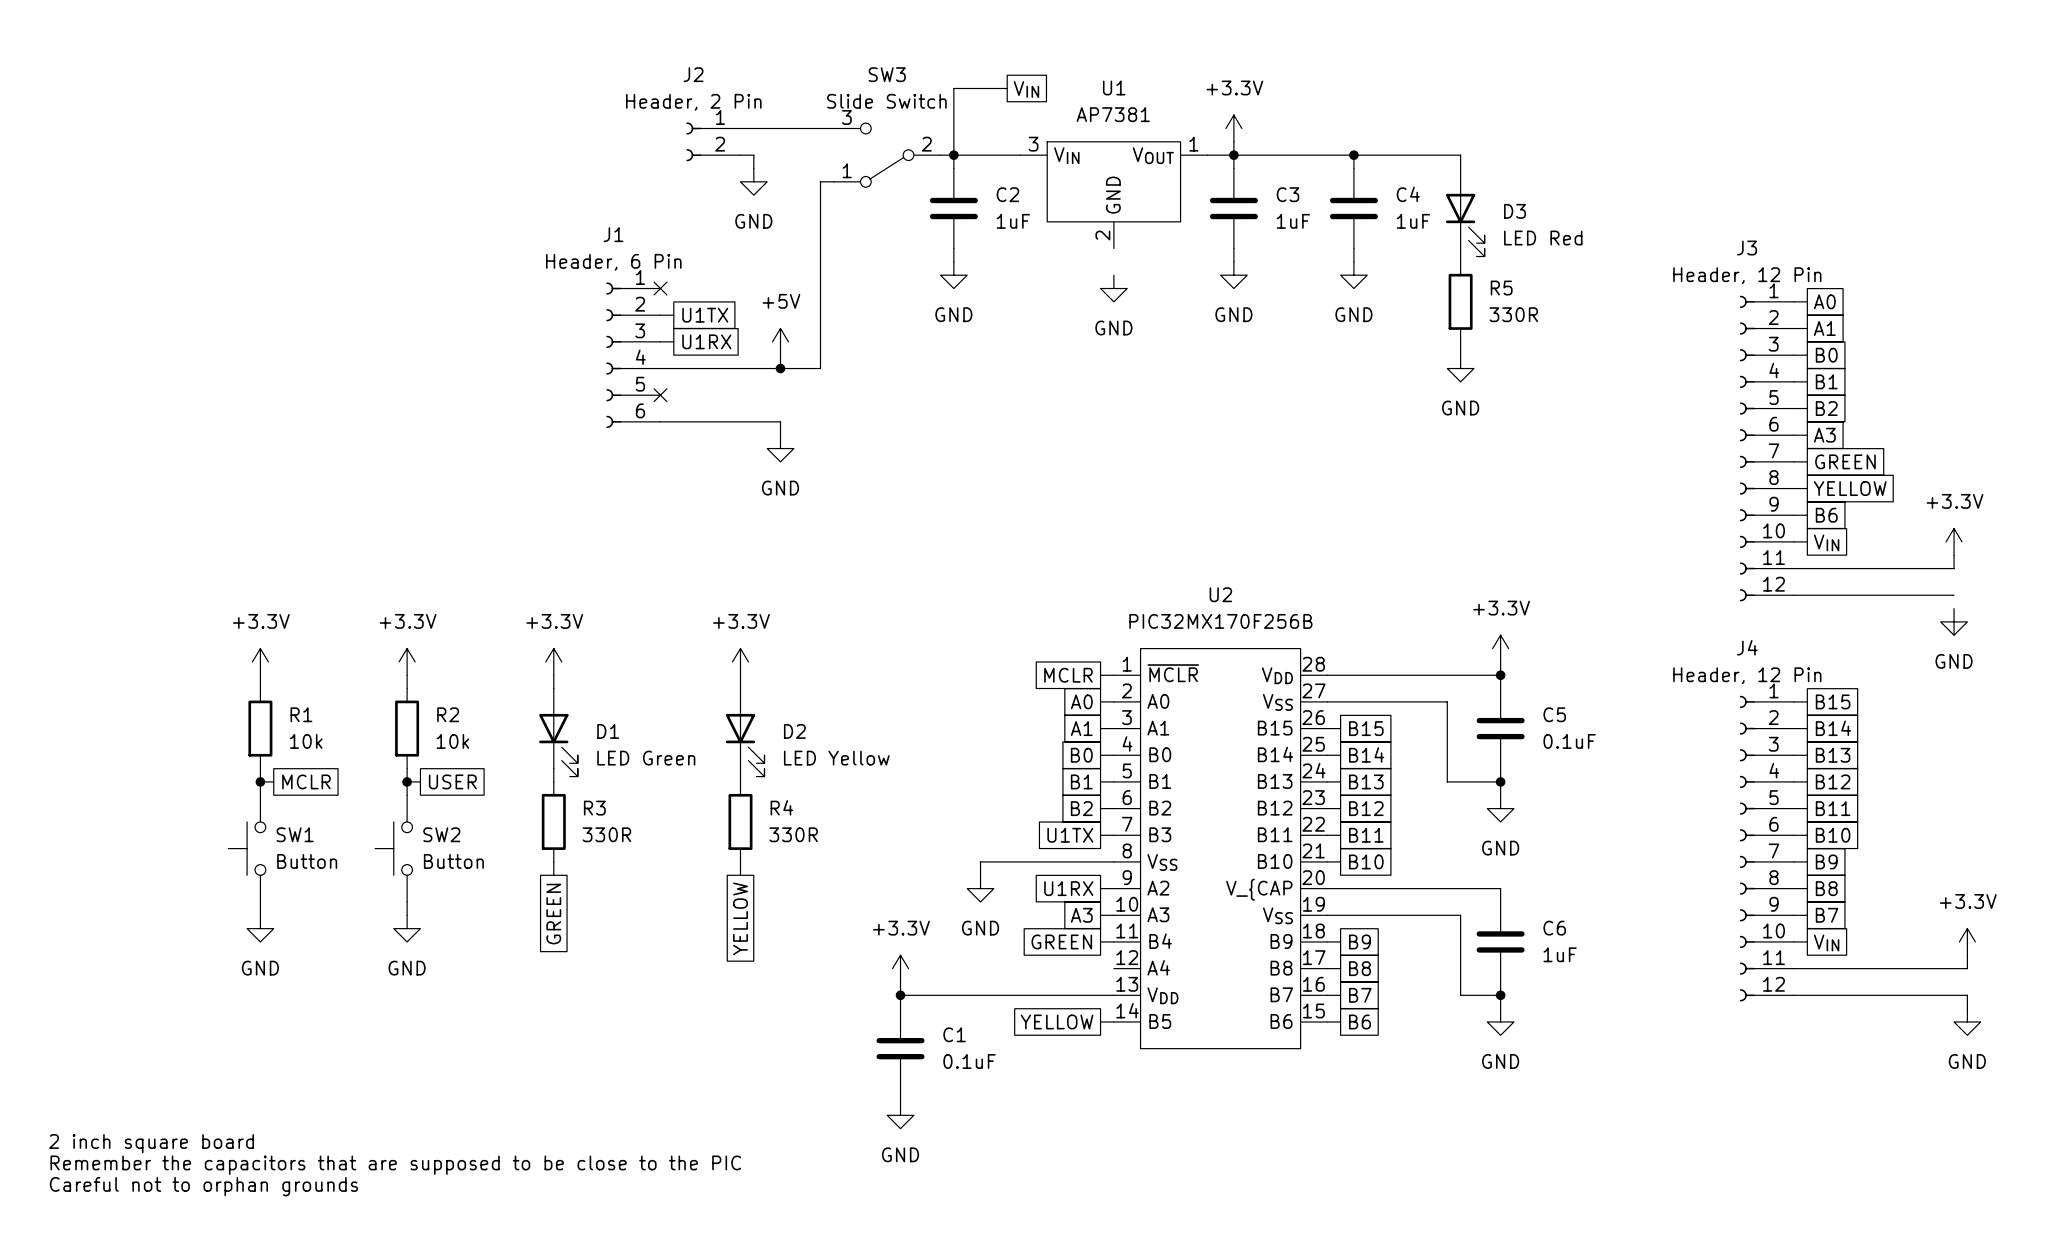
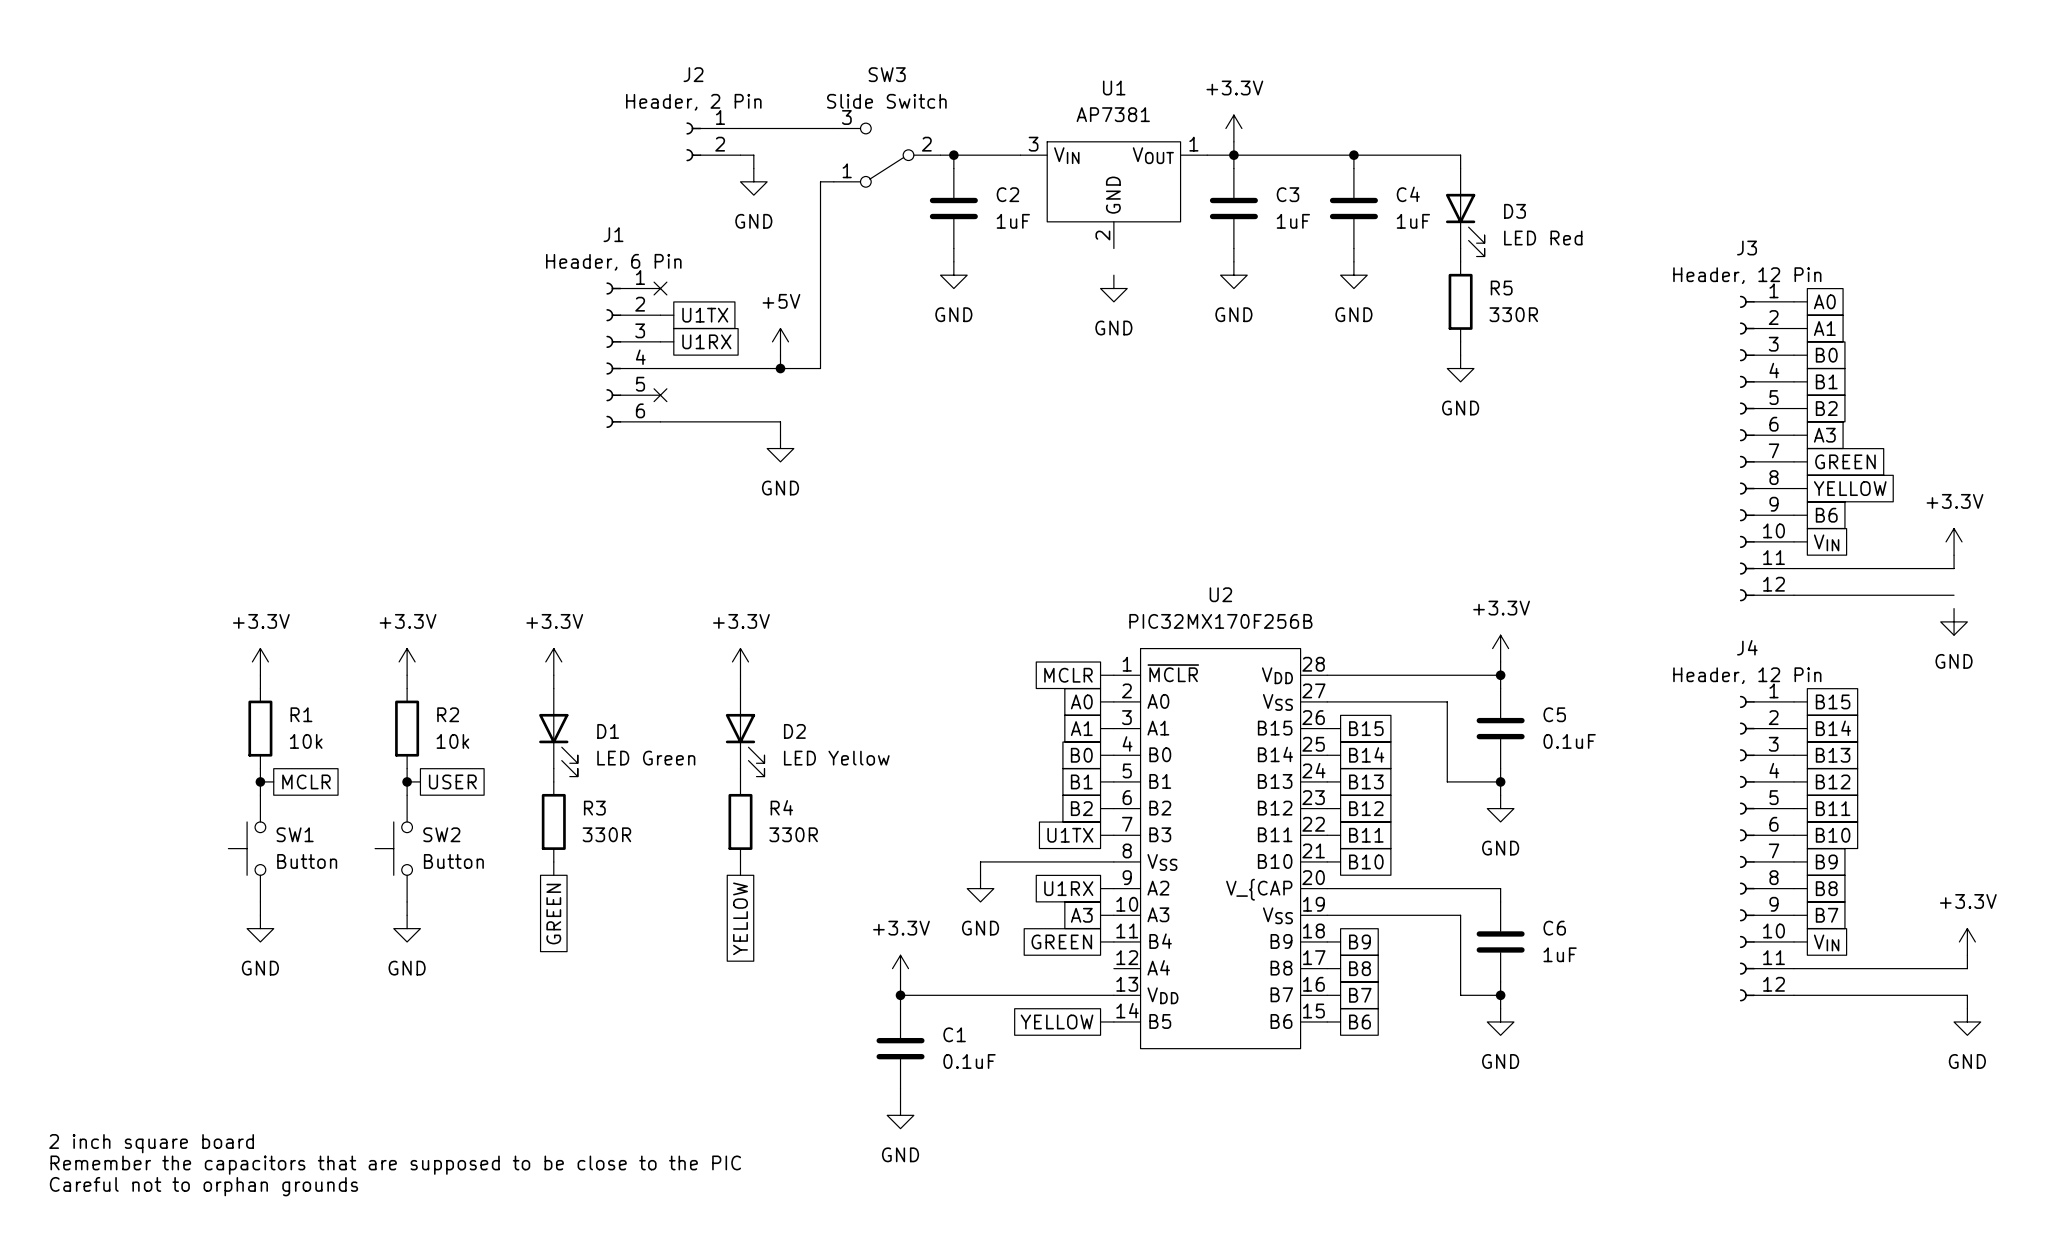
wire: (1007, 88) (953, 88) (953, 155) -> none
global label: VIN (1026, 89) -> none

